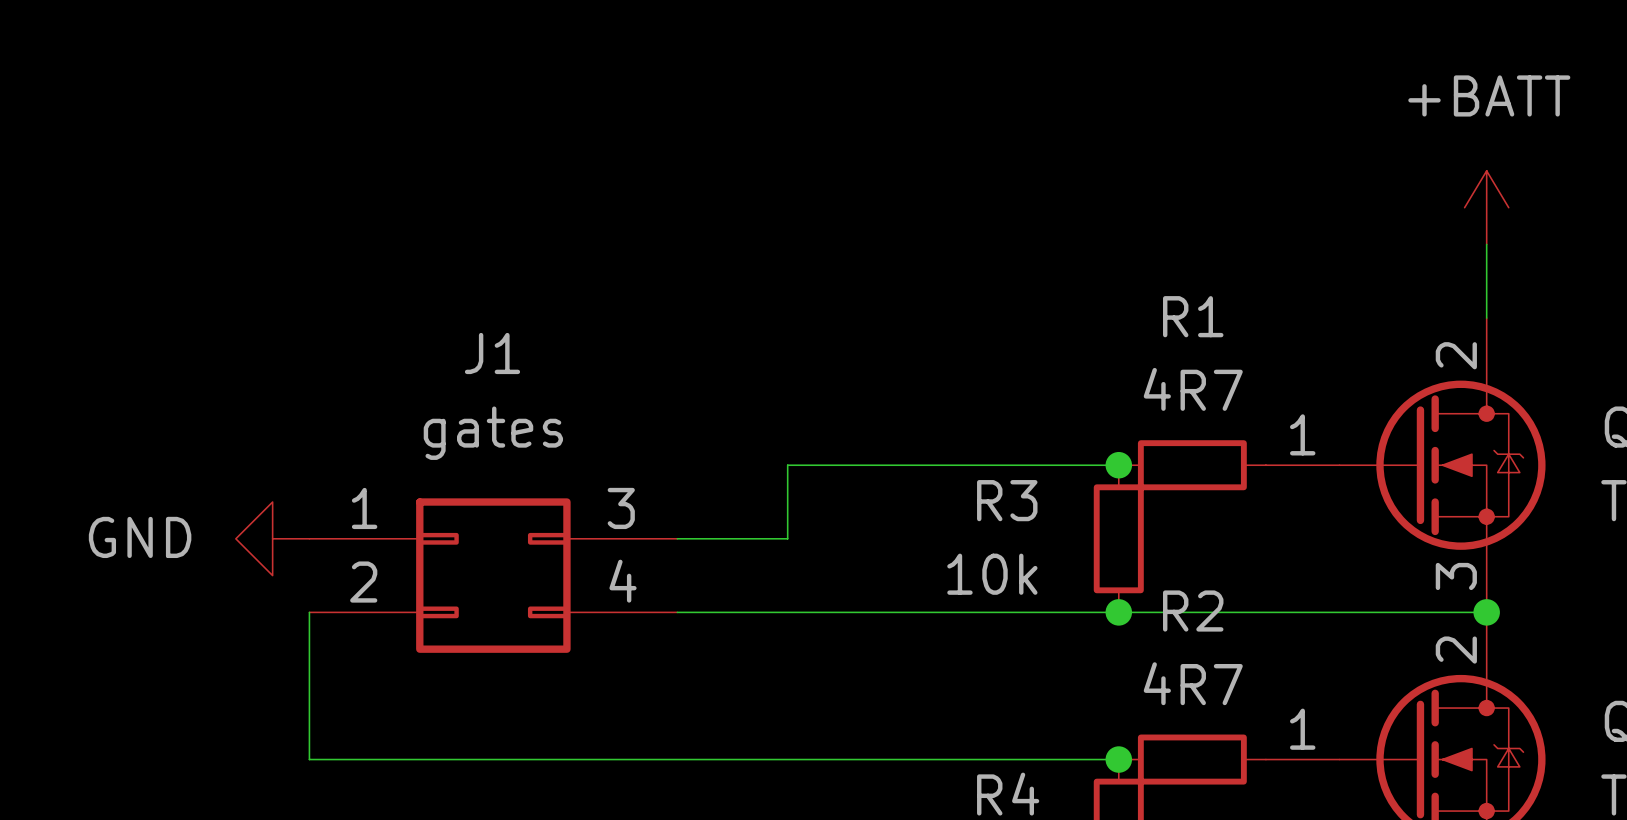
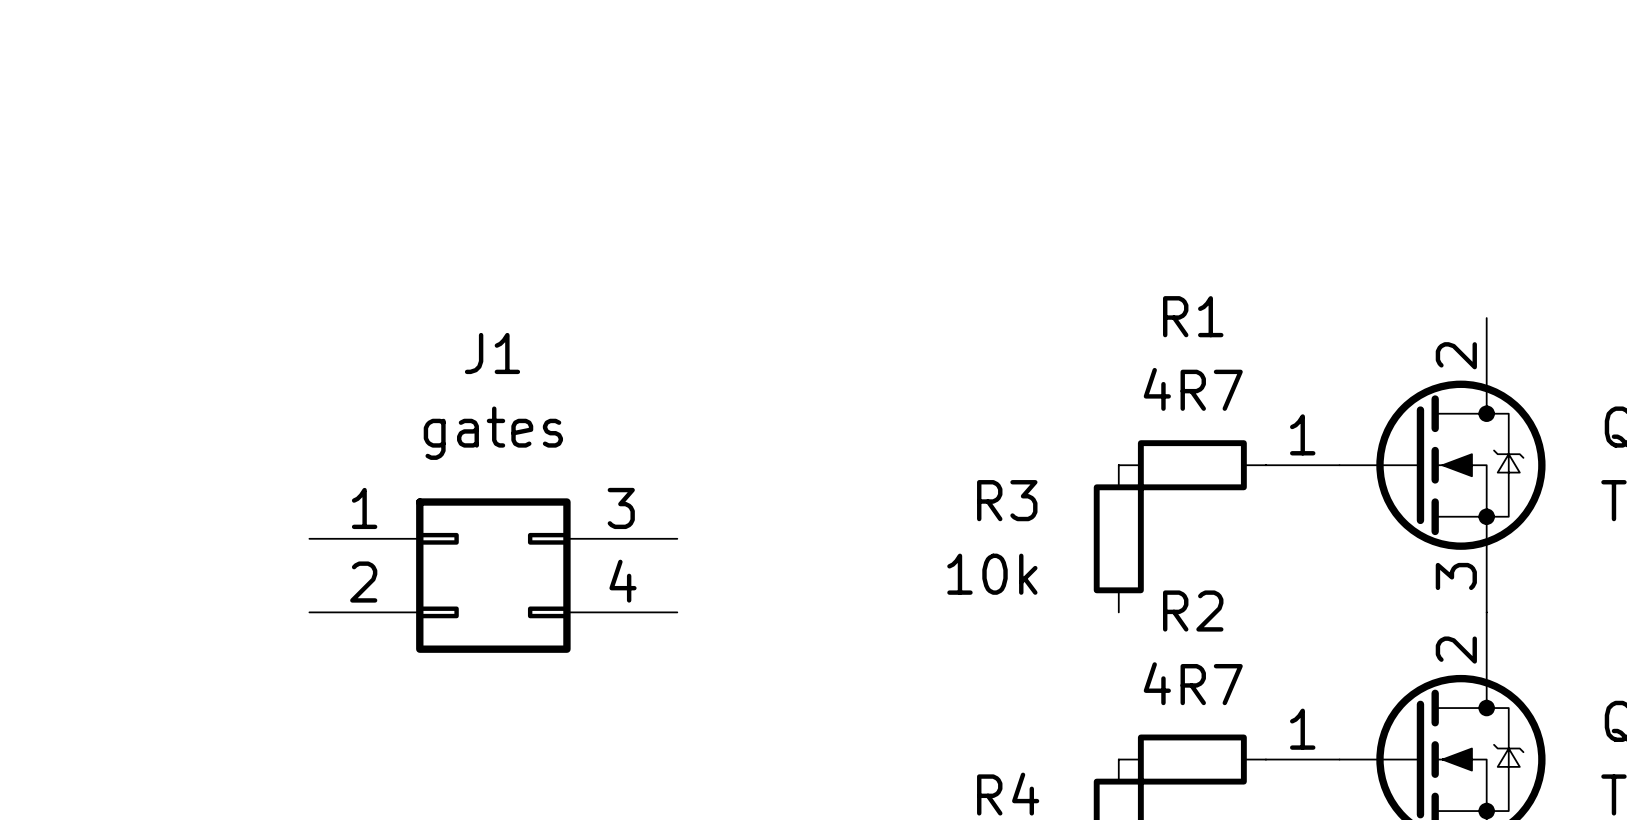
power symbol: +BATT (1486, 207) -> none
wire: (1486, 244) (1486, 318) -> none
wire: (1118, 465) (787, 465) (787, 538) (677, 538) -> none
junction: (1118, 465) -> none
power symbol: GND (272, 538) -> none
wire: (309, 612) (309, 759) (1118, 759) -> none
wire: (677, 612) (1486, 612) -> none
junction: (1118, 612) -> none
junction: (1486, 612) -> none
junction: (1118, 759) -> none

